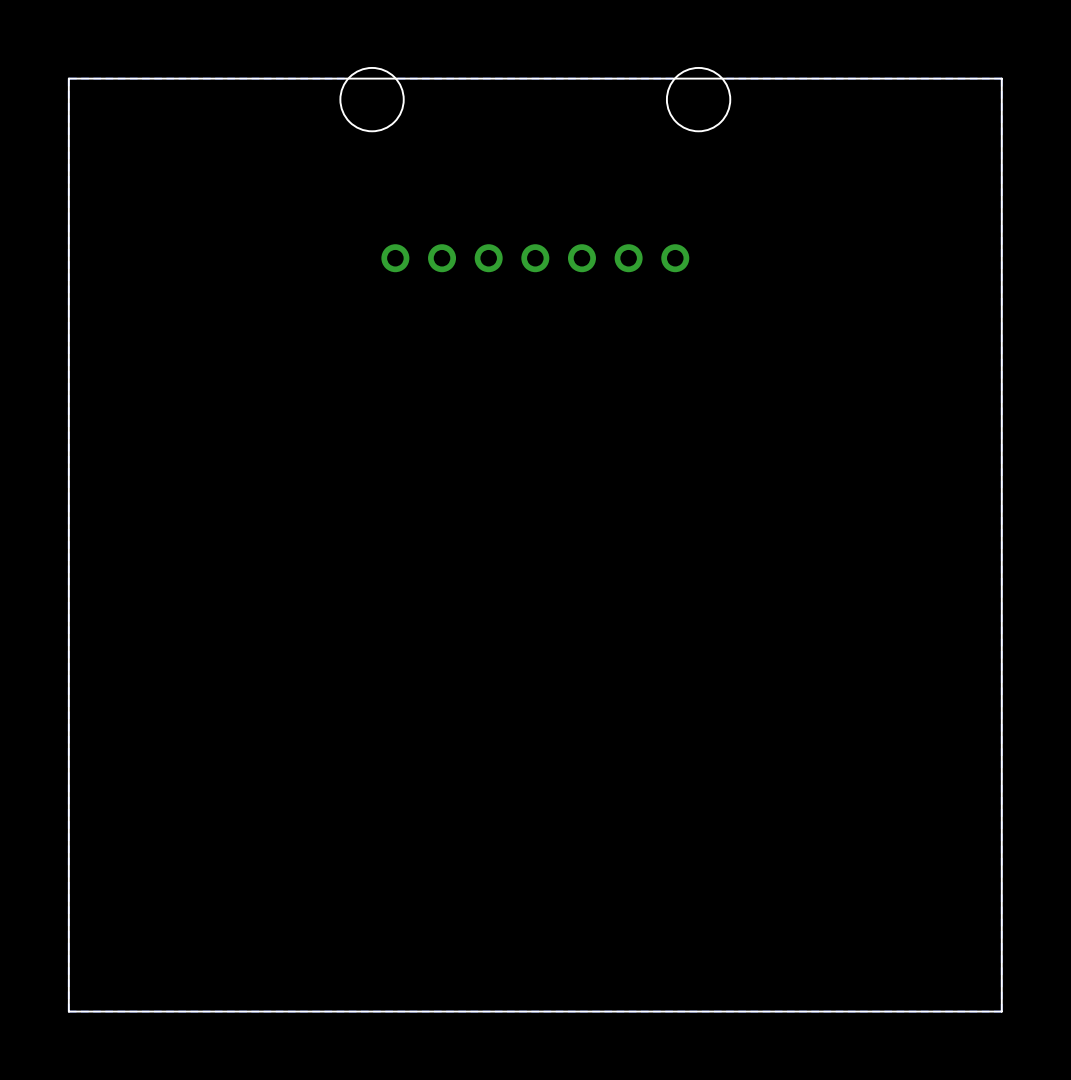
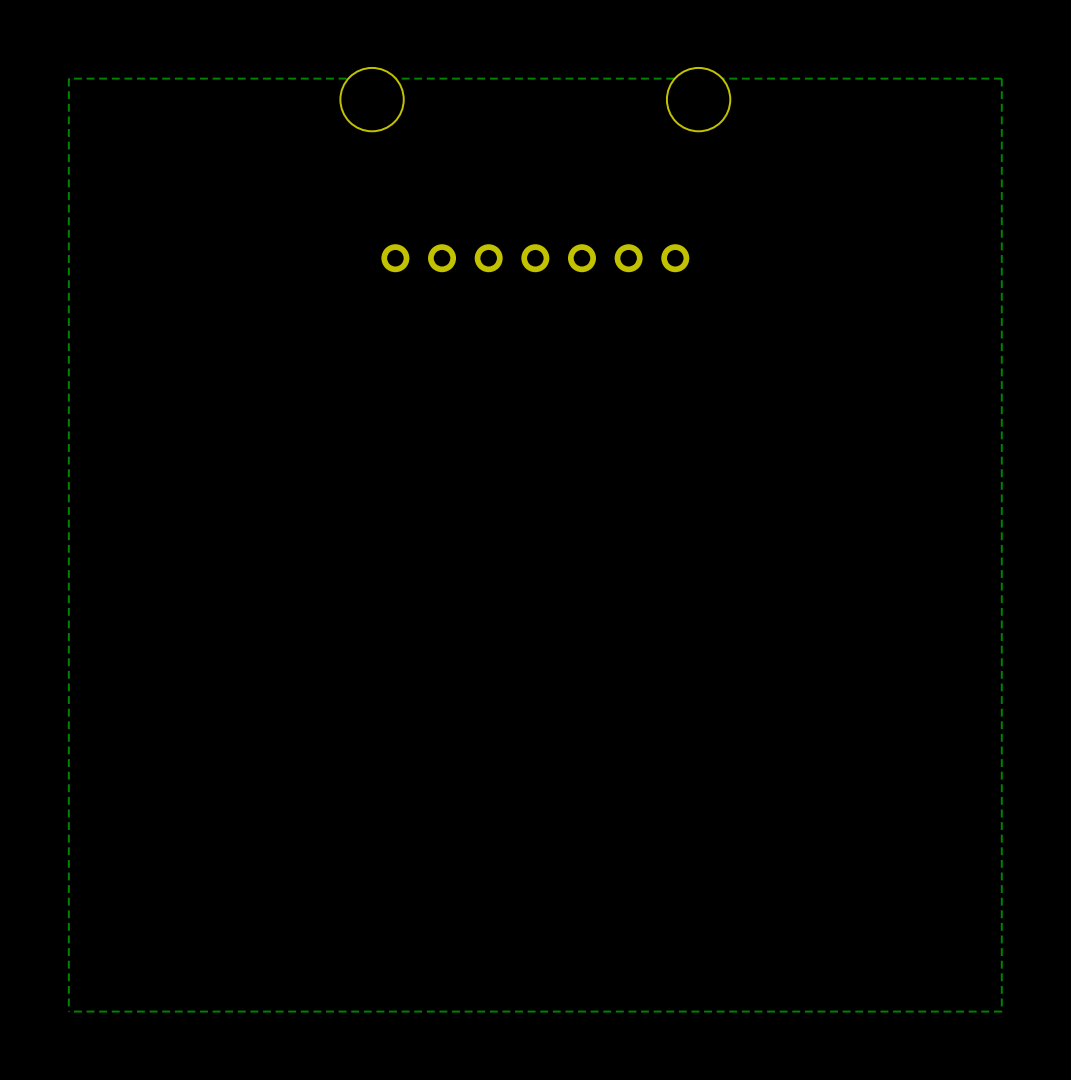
board edge: (1001, 78) (1001, 1011) (68, 1011) (68, 78) (1001, 78) -> none

